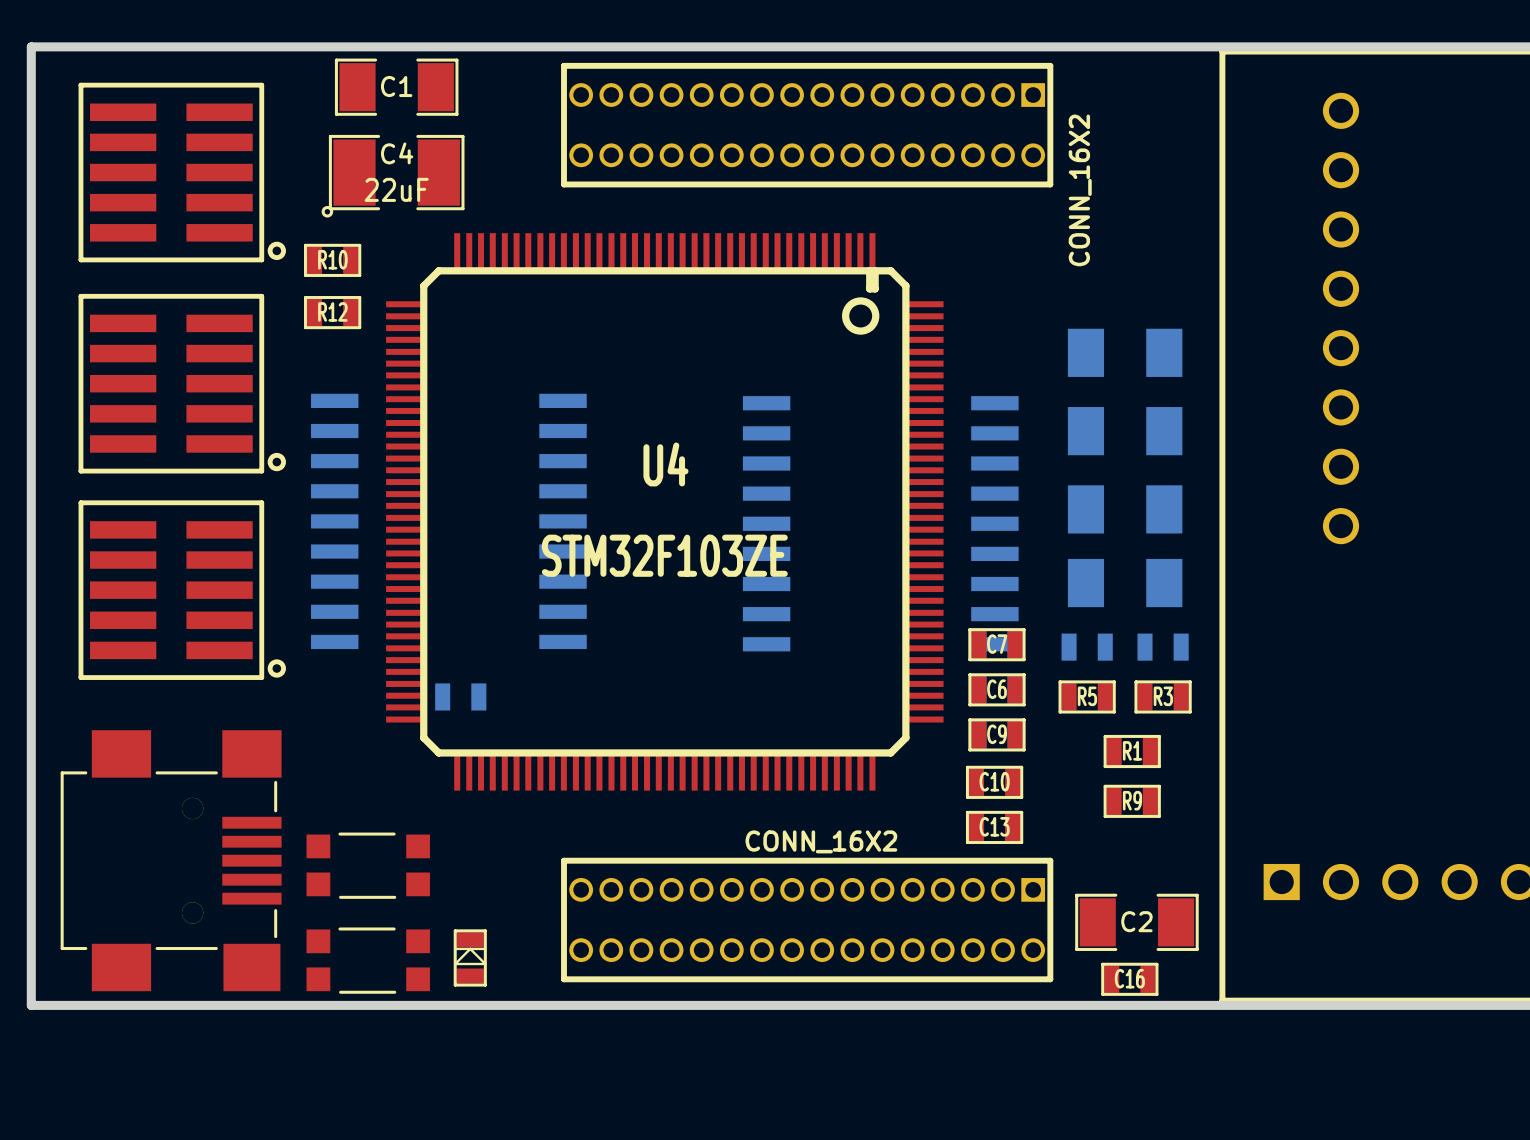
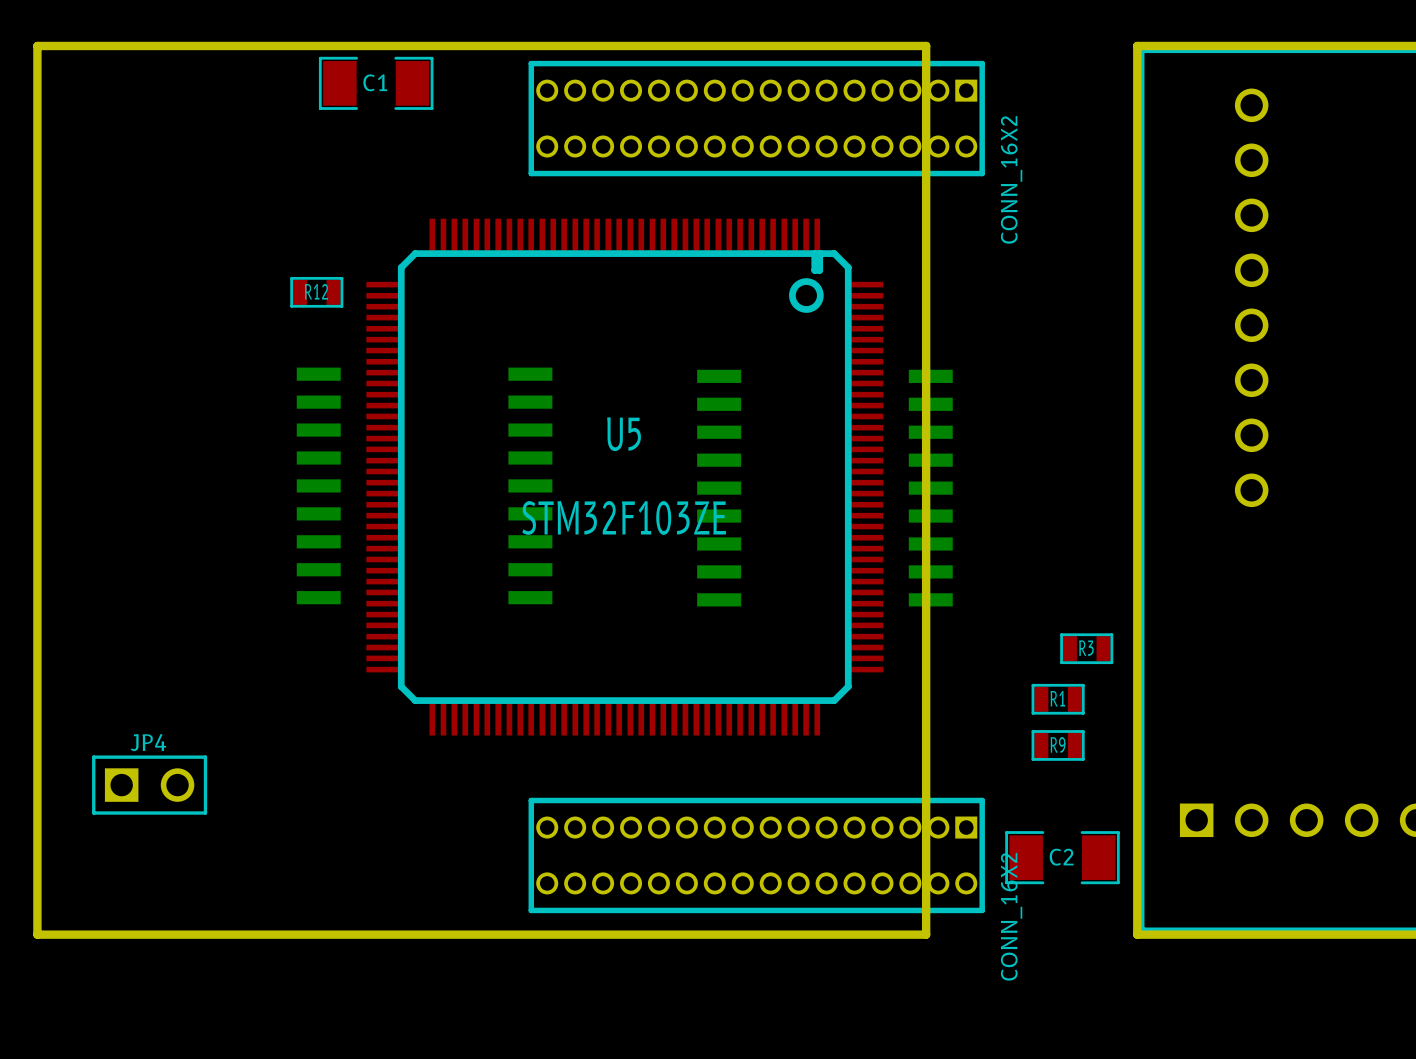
board edge: (989, 46) (1217, 46) -> (926, 45) (926, 934)
part: (182, 172) -> none
C4: 22uF (393, 176) -> none
R10: (332, 260) -> none
part: (1125, 352) -> none
part: (182, 383) -> none
part: (1125, 431) -> none
U4 name: U4 (665, 464) -> U5 (624, 434)
part: (1125, 509) -> none
part: (1125, 583) -> none
part: (182, 590) -> none
C7: (996, 644) -> none
part: (1087, 647) -> none
part: (1163, 647) -> none
C6: (997, 689) -> none
part: (460, 696) -> none
R5: (1087, 696) -> none
C9: (997, 734) -> none
C10: (994, 782) -> none
C13: (994, 827) -> none
part value rotation: 0° (821, 841) -> 90° counterclockwise (1011, 916)
part value position: CONN_16X2 (821, 841) -> CONN_16X2 (1011, 916)
JP4: none -> (149, 785)
part: (171, 860) -> none
part: (368, 865) -> none
part: (470, 957) -> none
part: (368, 960) -> none
C16: (1129, 979) -> none
board edge: (989, 1005) (1217, 1005) -> (1137, 45) (1137, 934)

